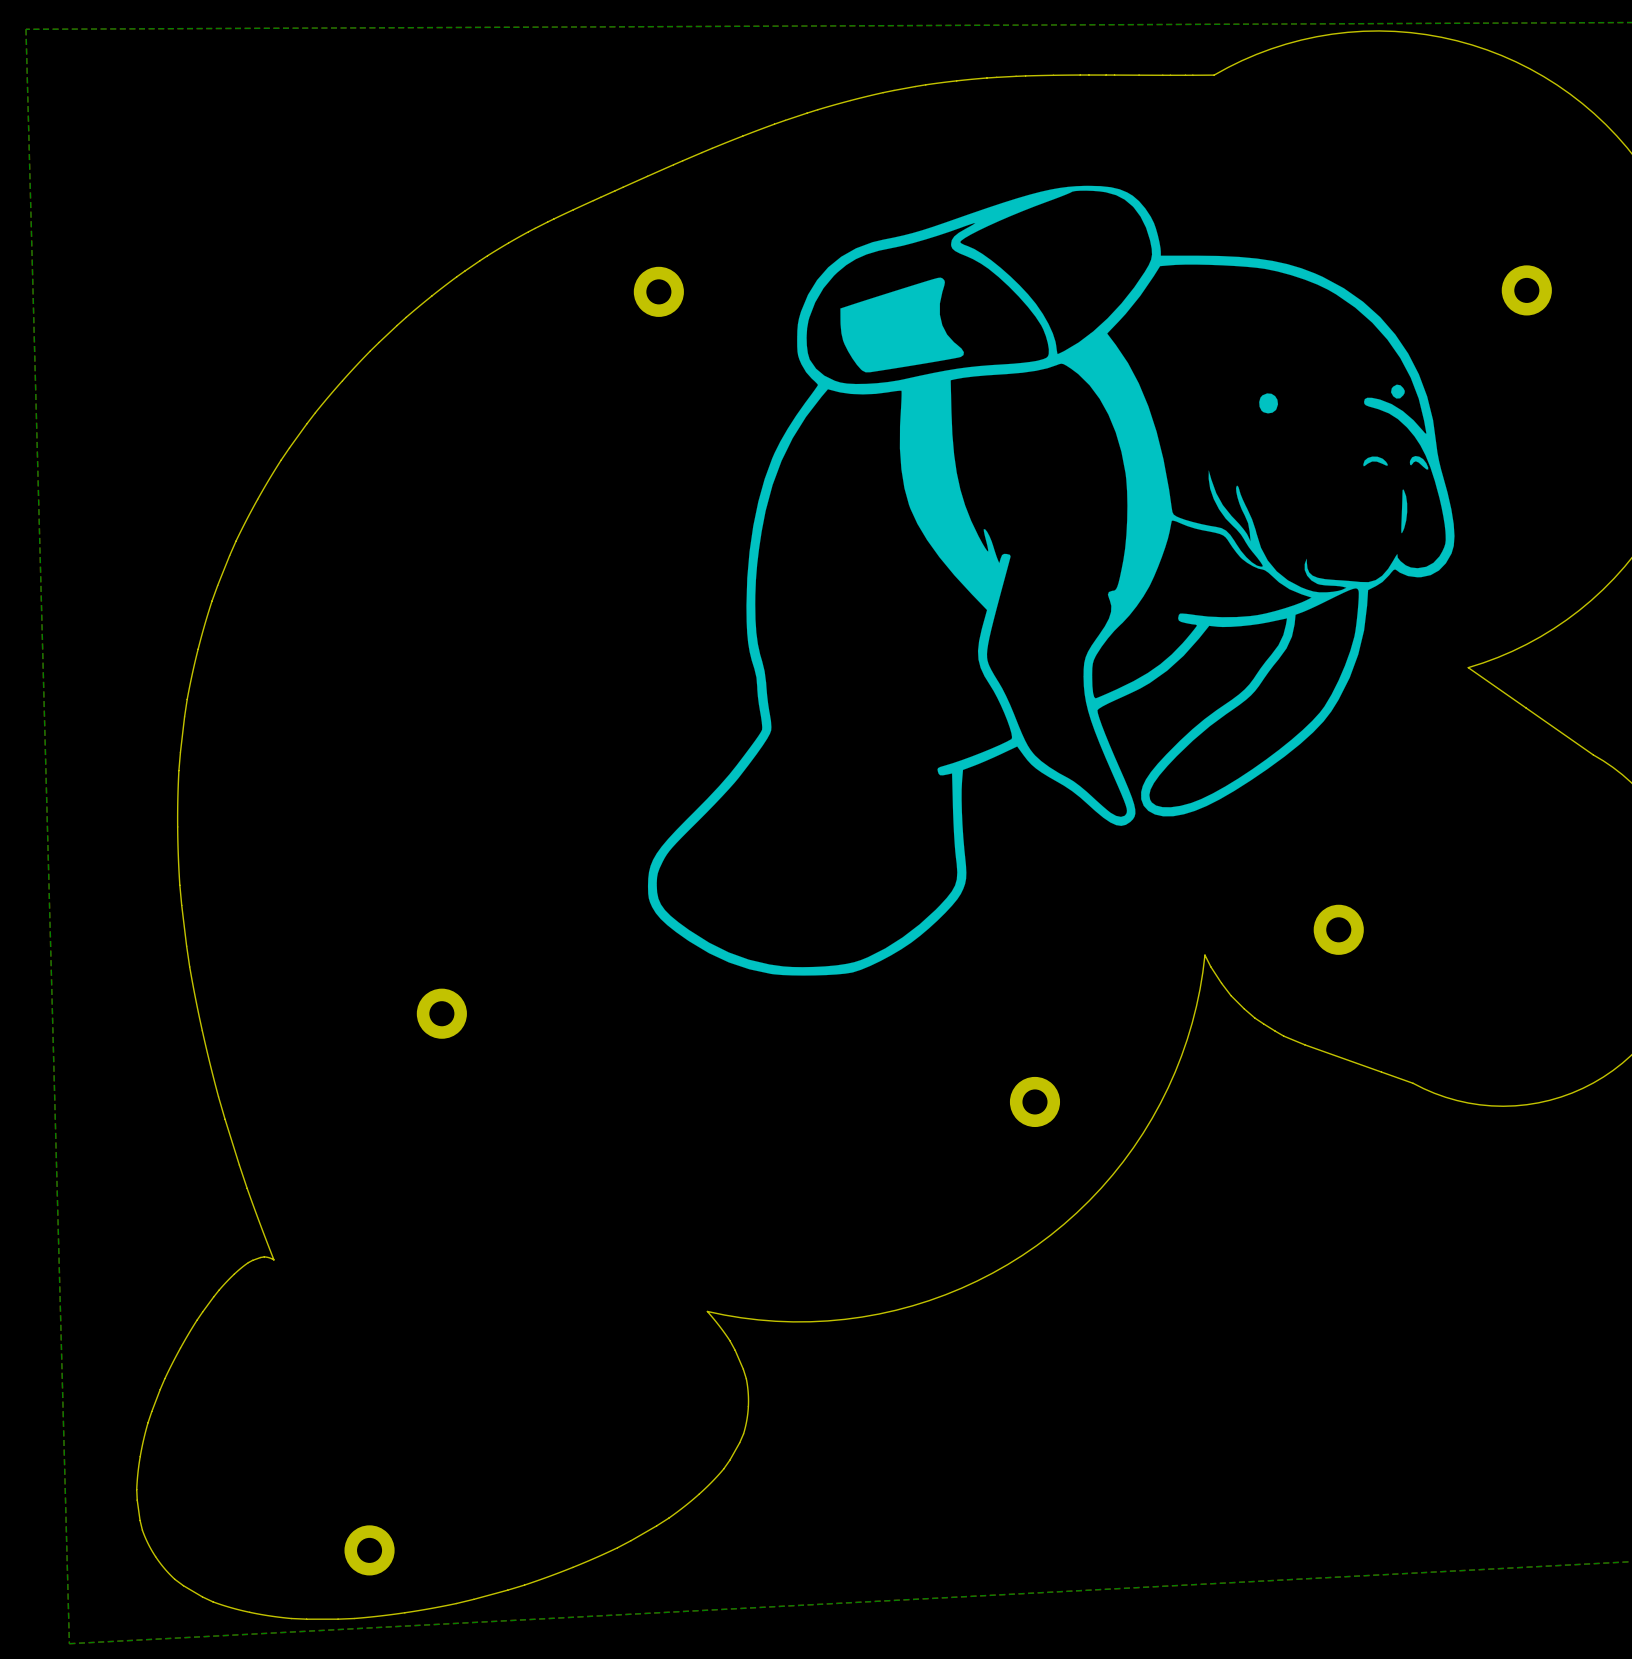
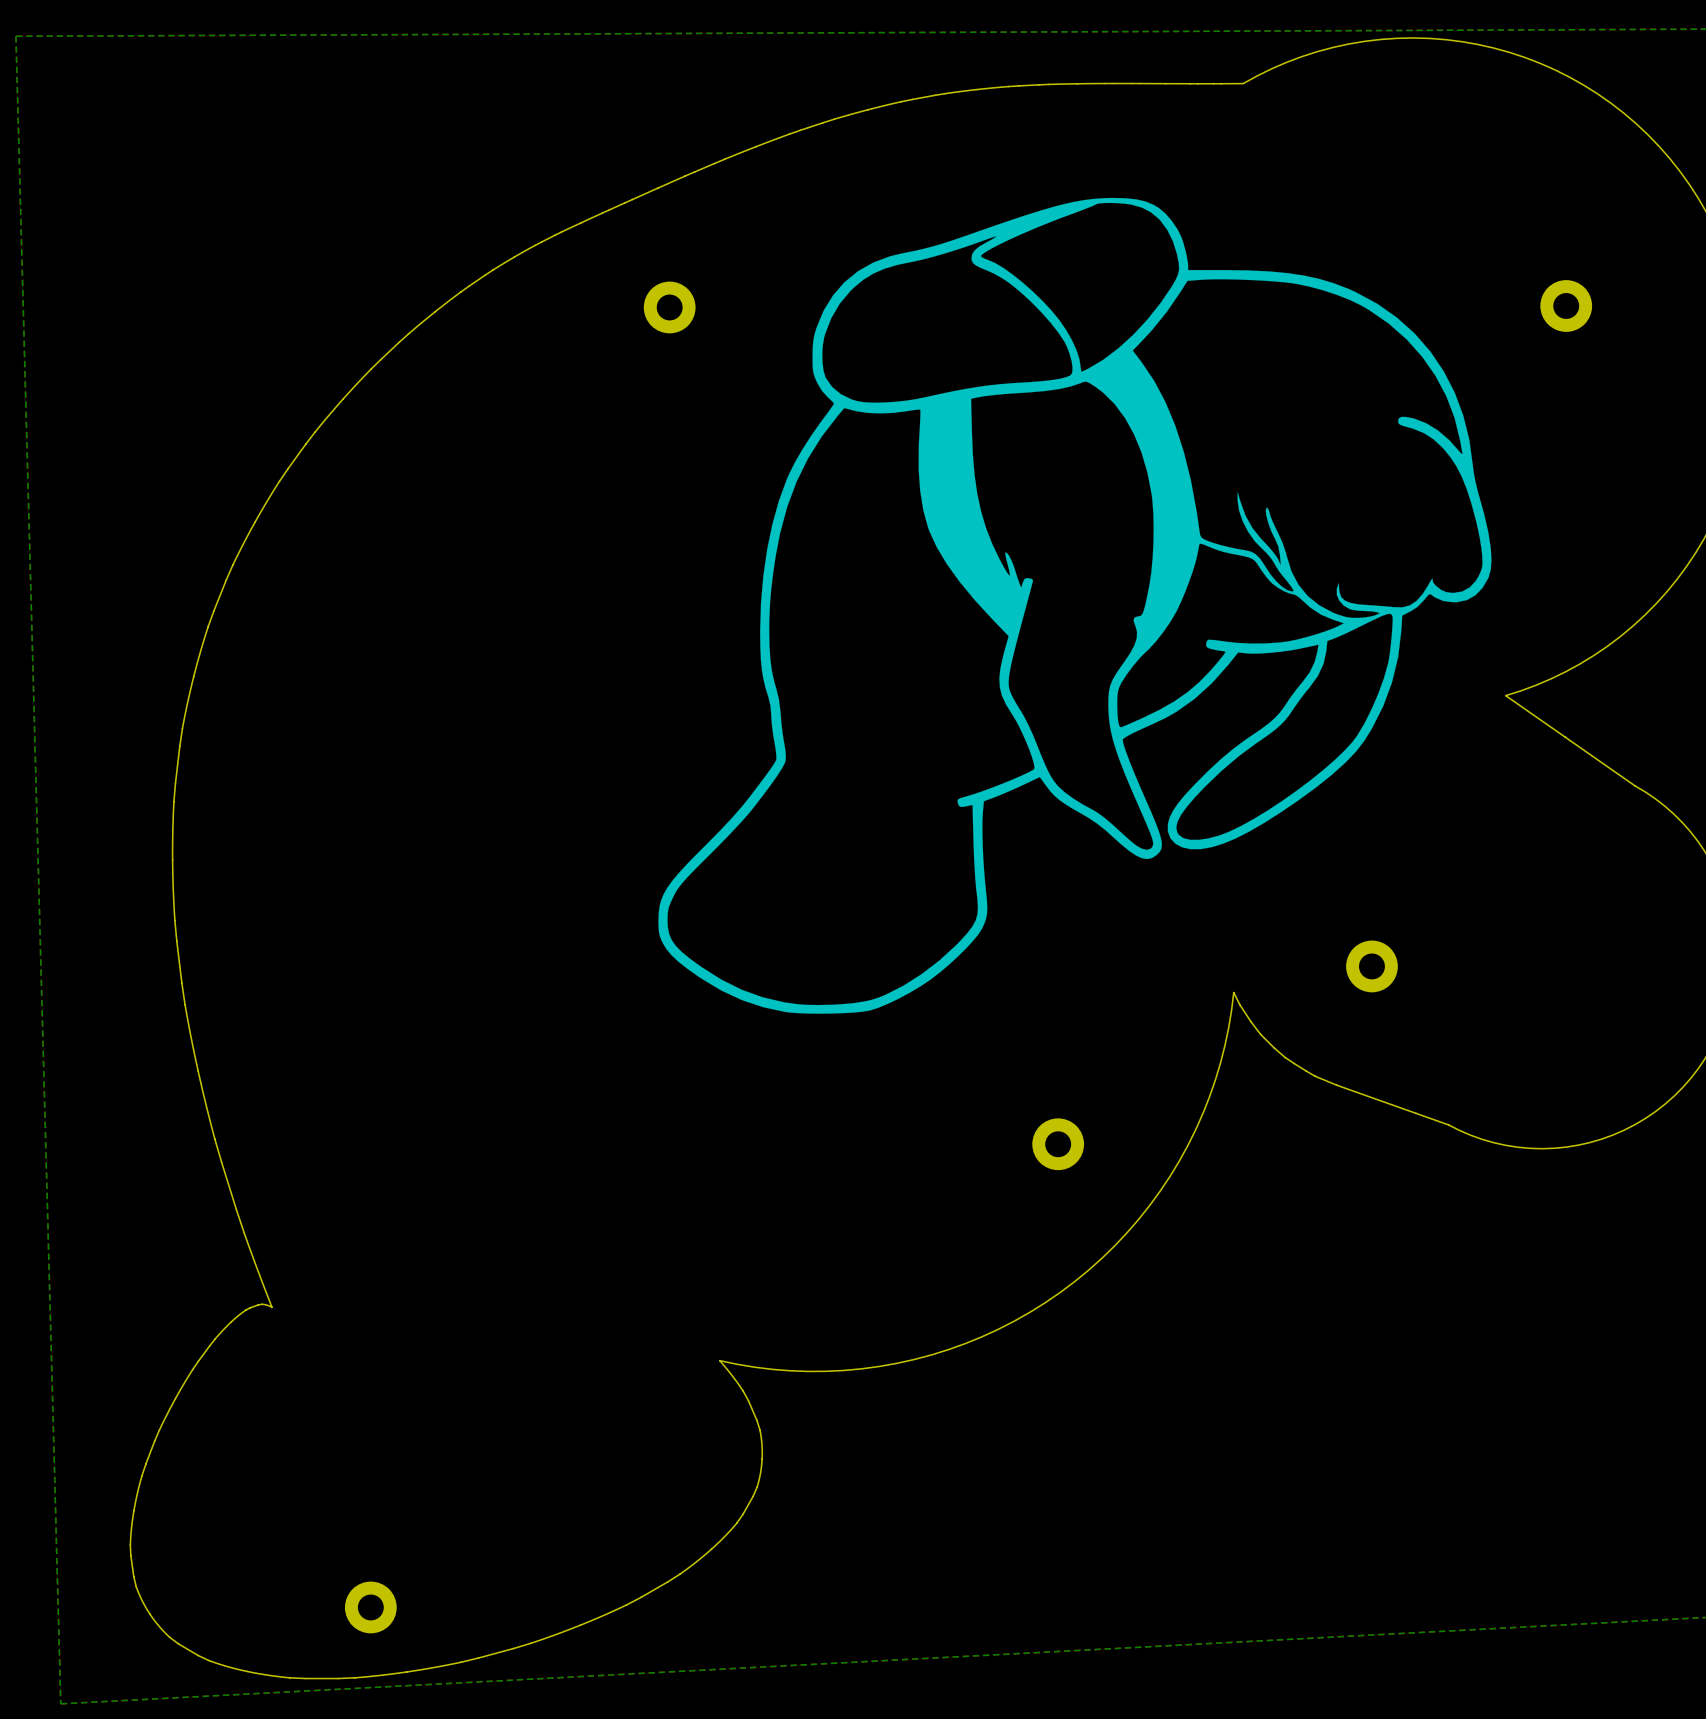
drawing shape: [647, 185, 1455, 976] -> [658, 197, 1492, 1014]
part: (441, 1013) -> none

